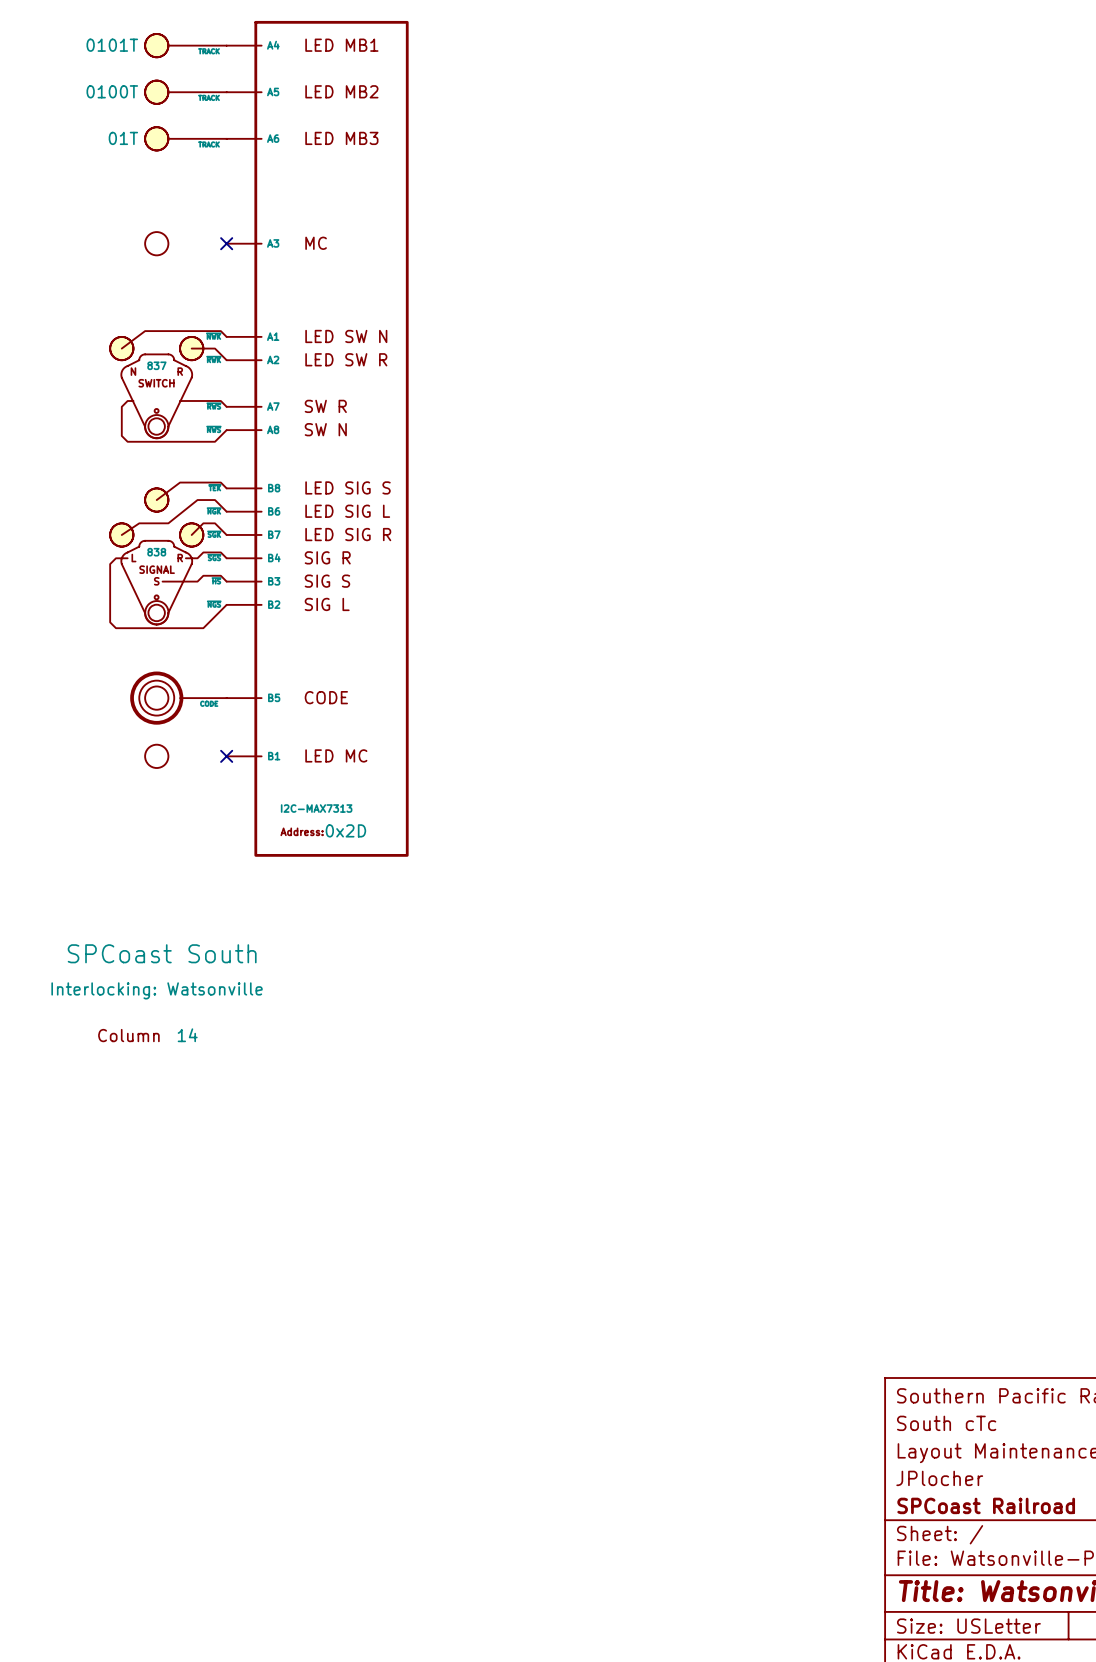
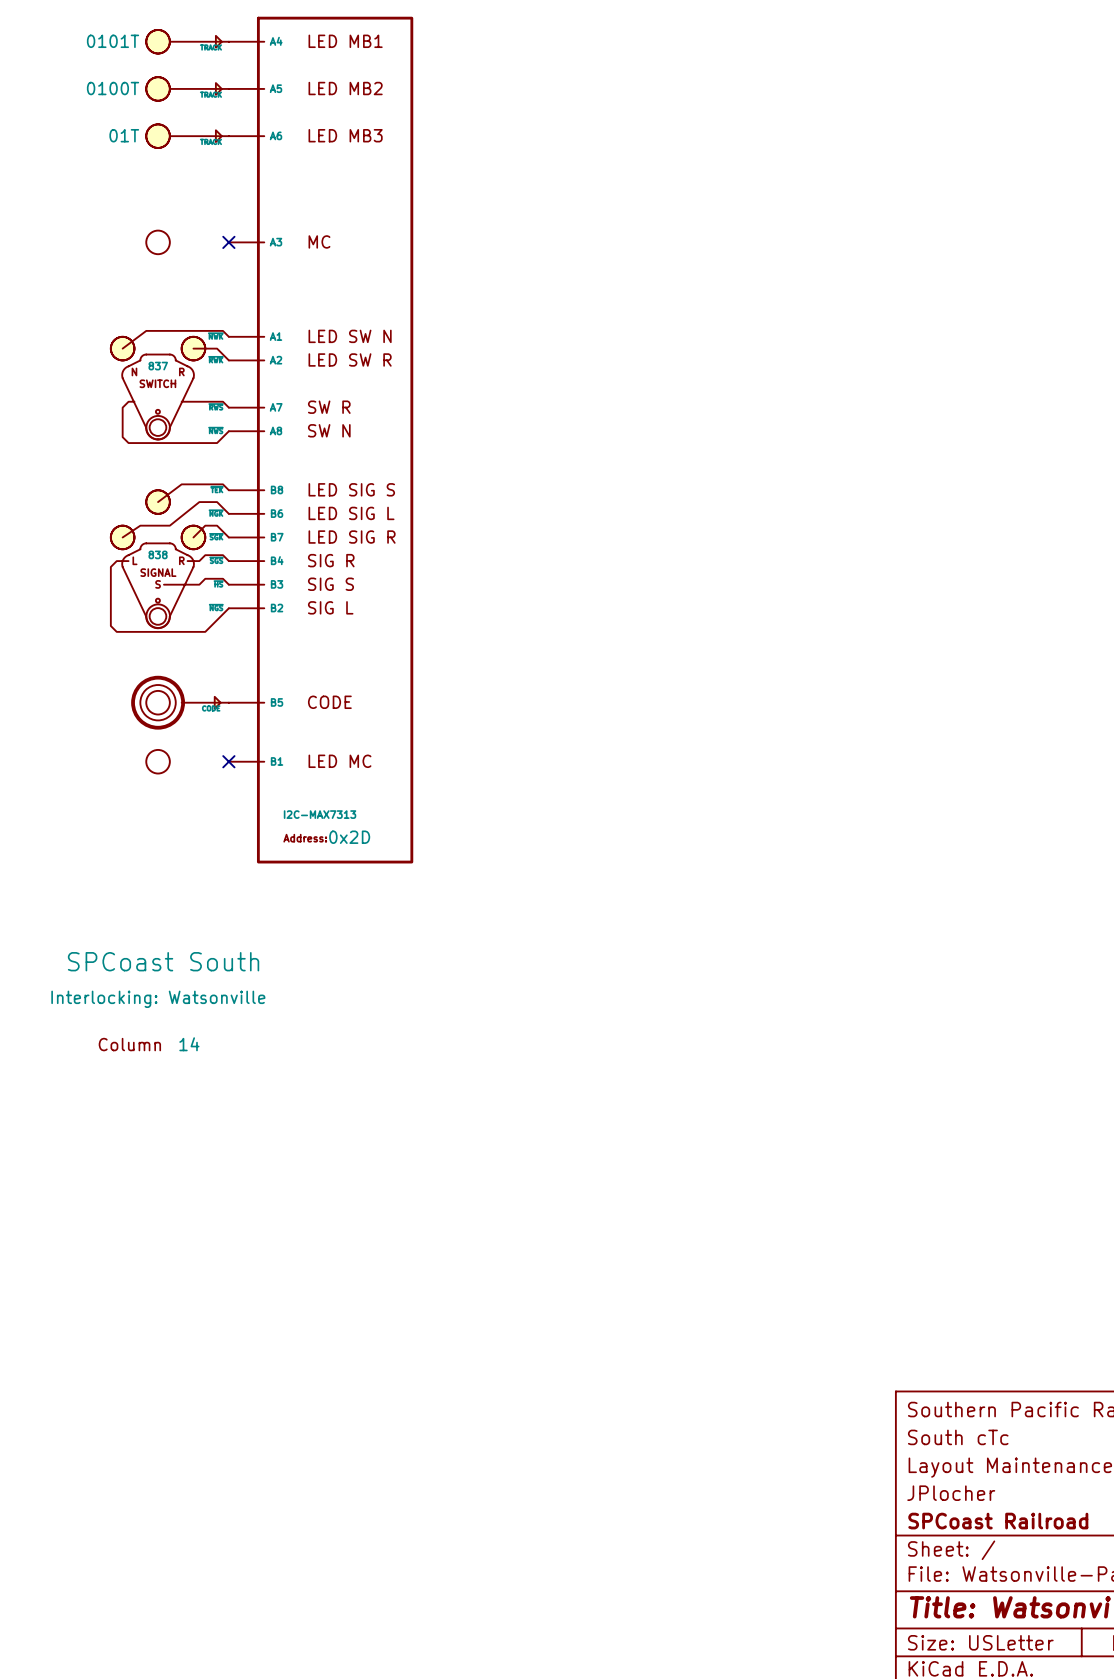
part symbol: [144, 33, 227, 59] -> [145, 28, 229, 55]
part symbol: [144, 79, 227, 105] -> [145, 76, 229, 102]
part symbol: [144, 126, 227, 152] -> [145, 123, 229, 149]
part symbol: [130, 671, 227, 725] -> [131, 675, 229, 730]

